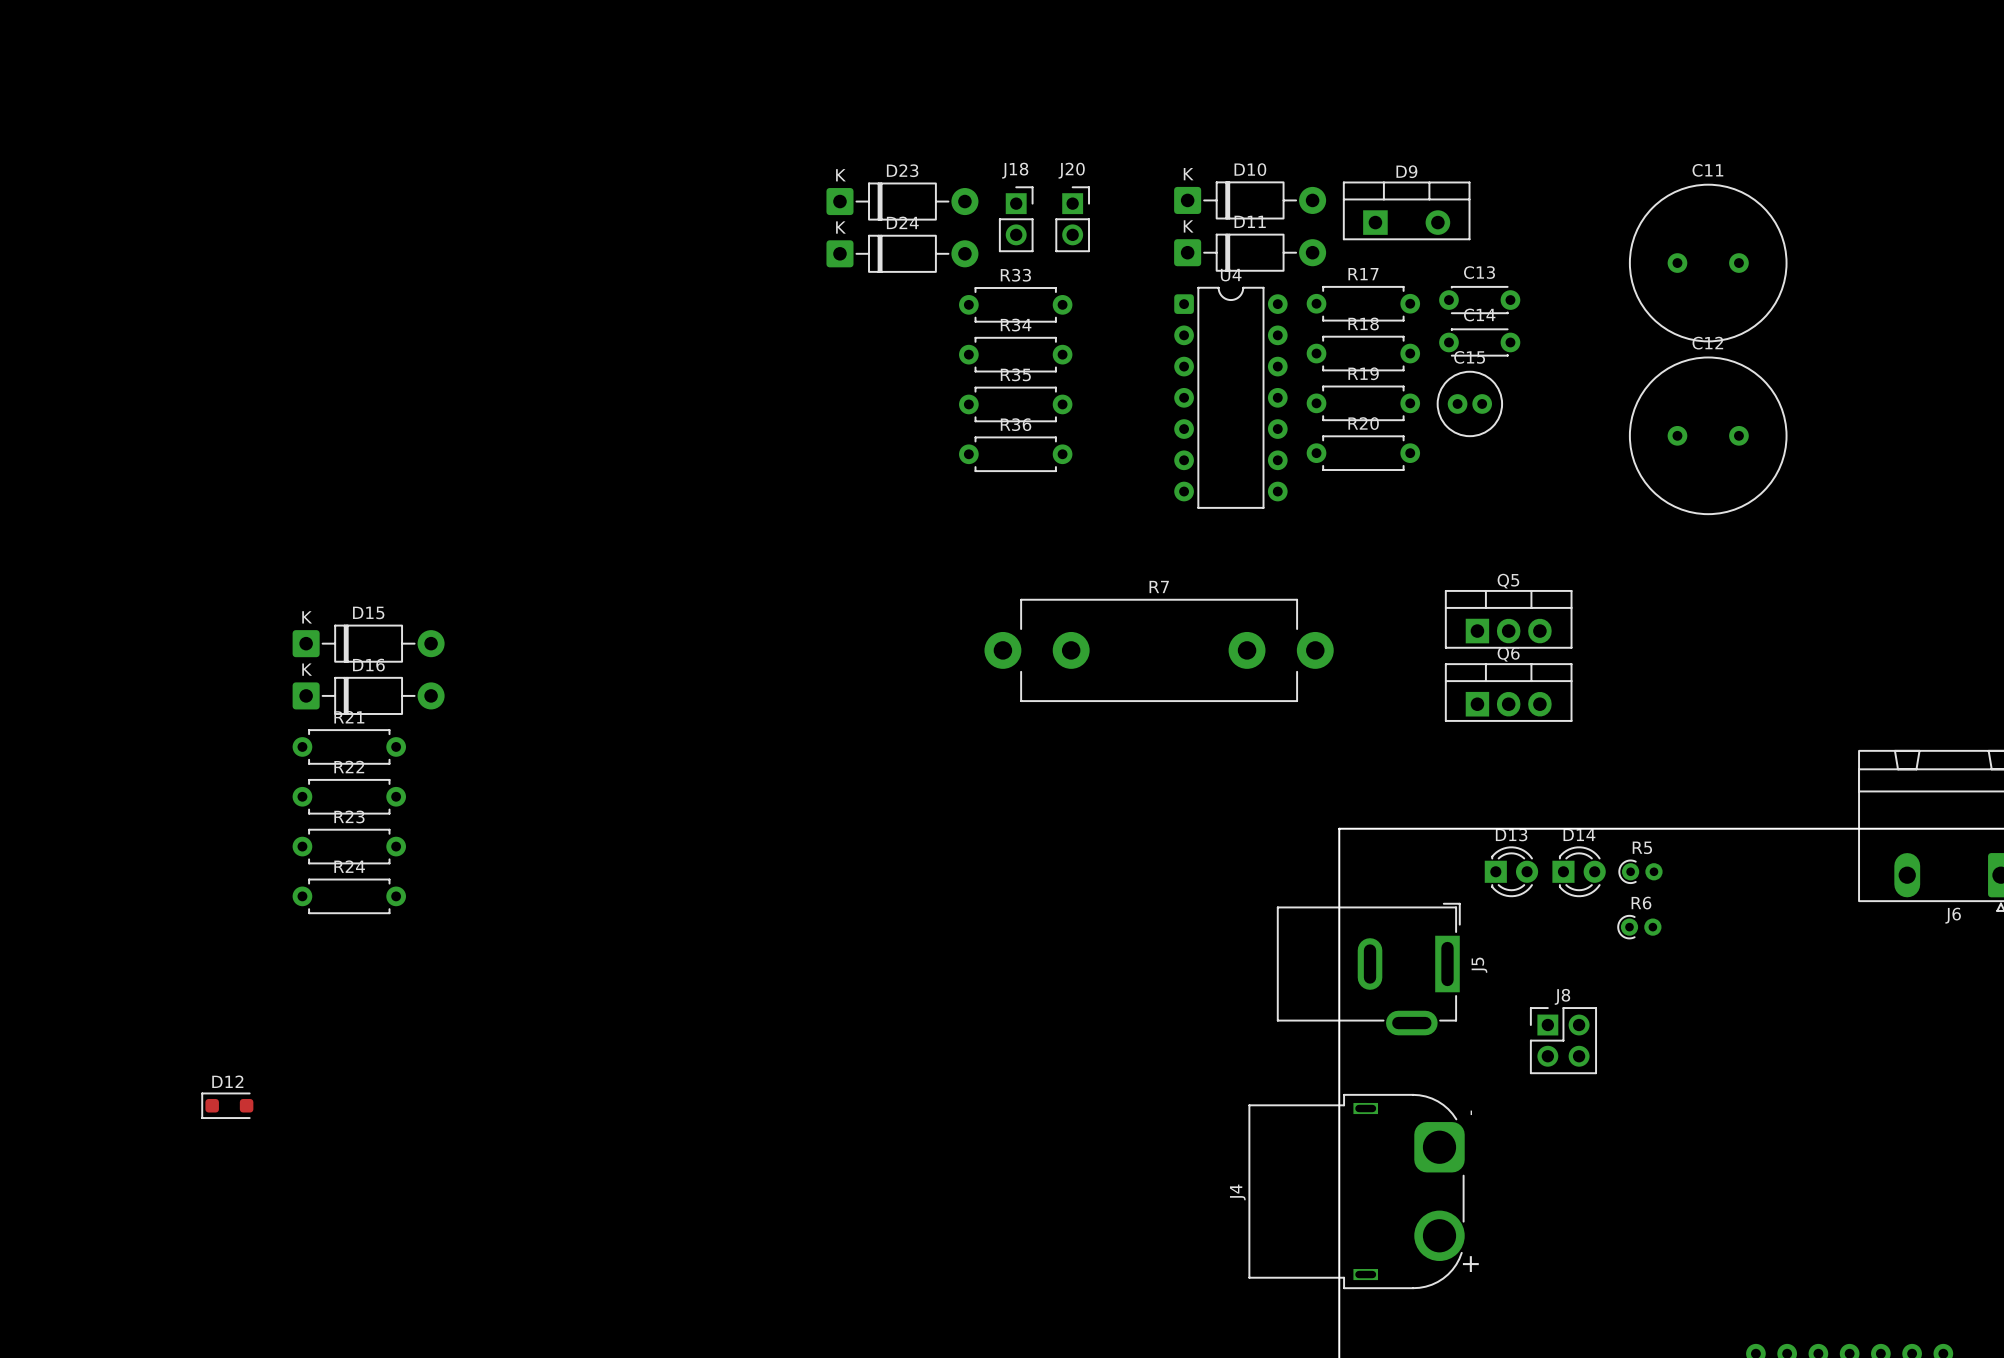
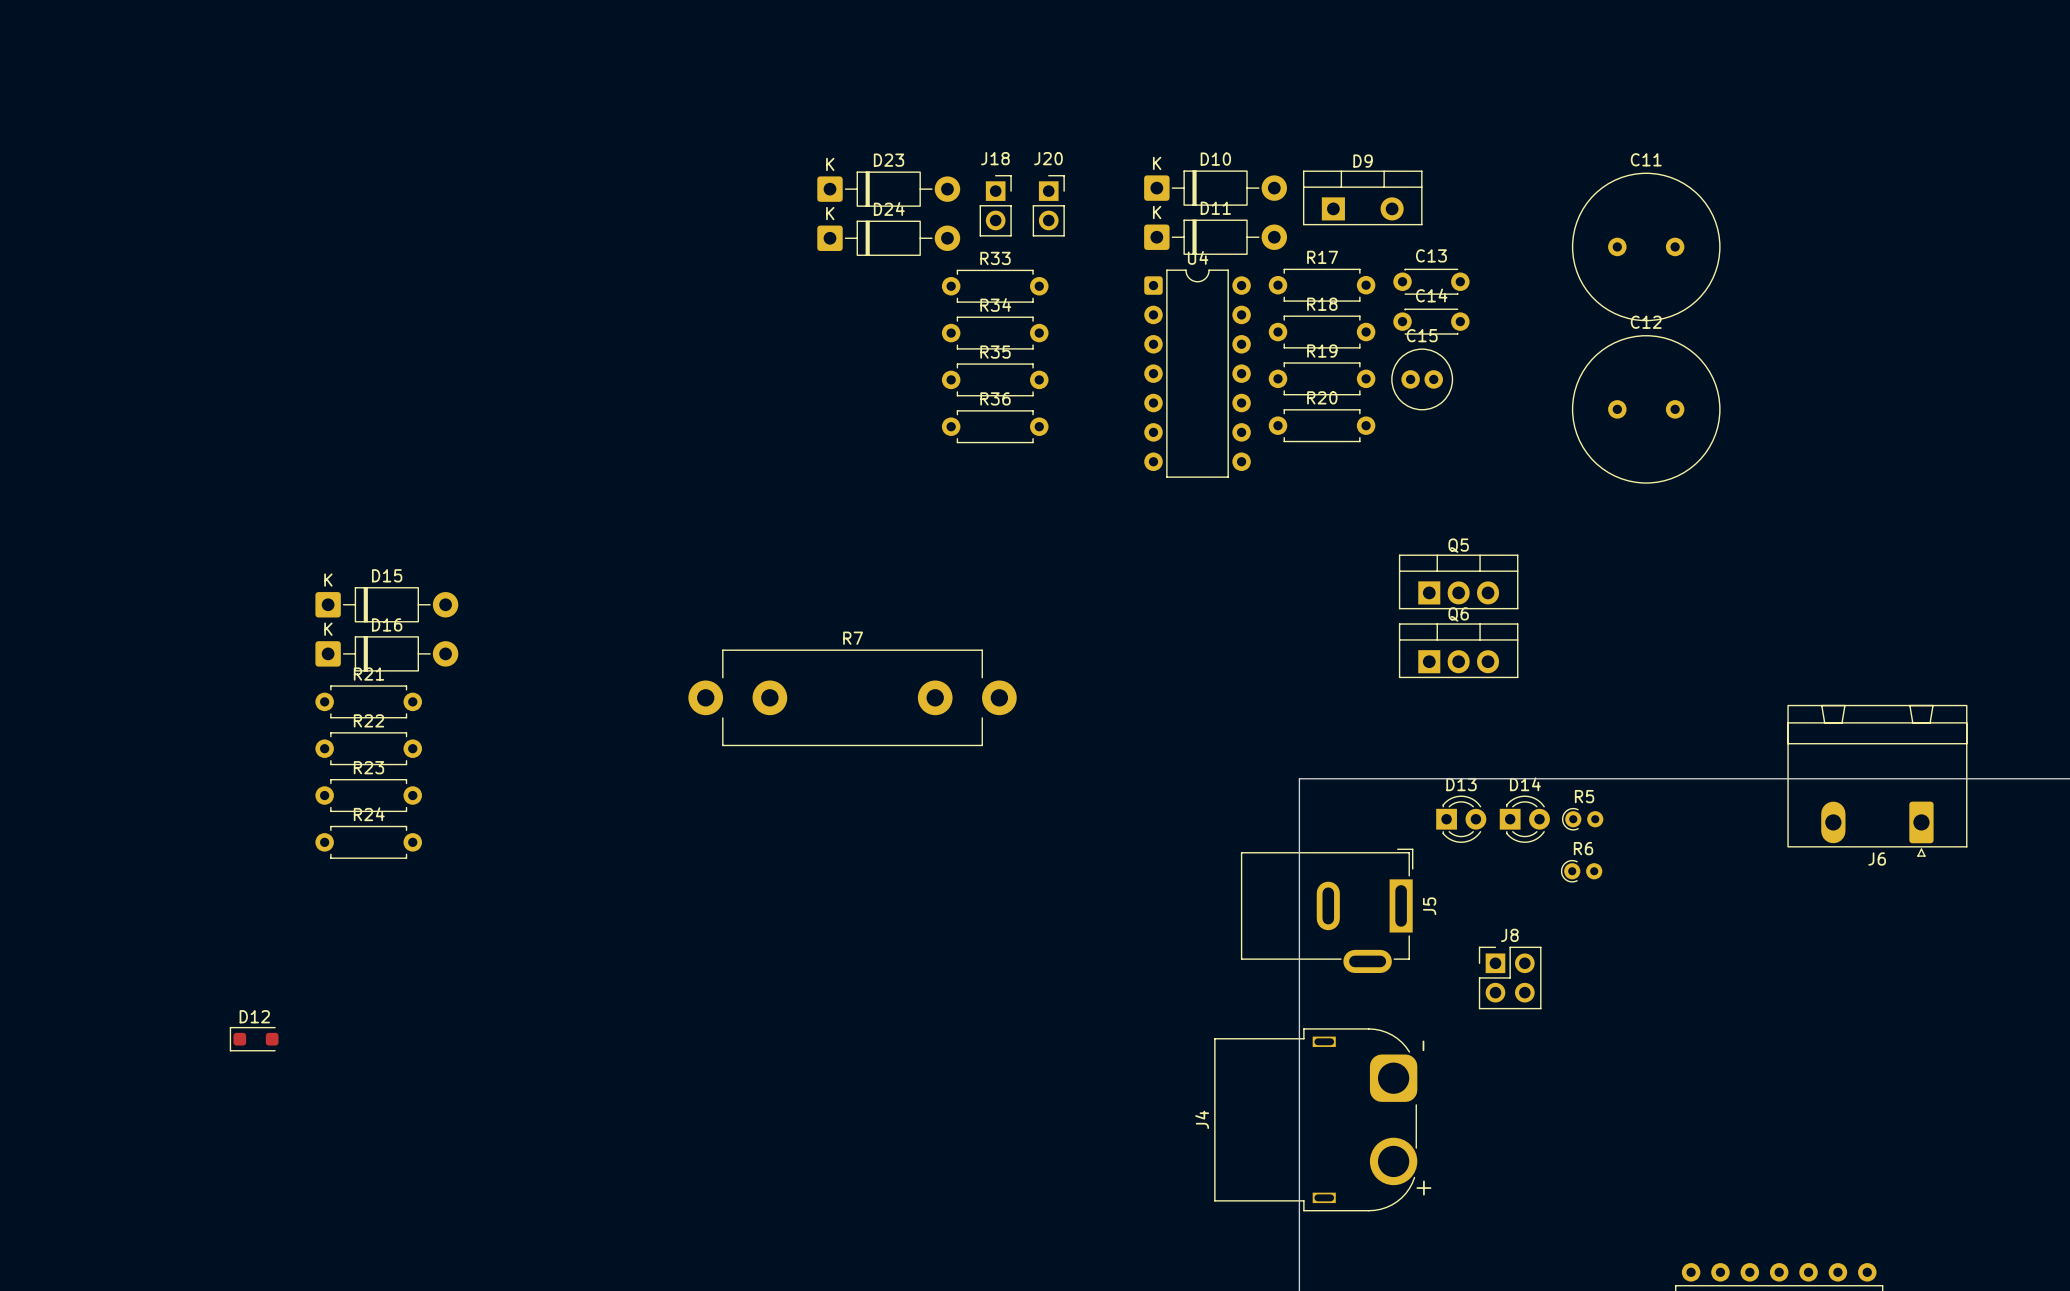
R7 position: (1159, 650) -> (852, 697)

